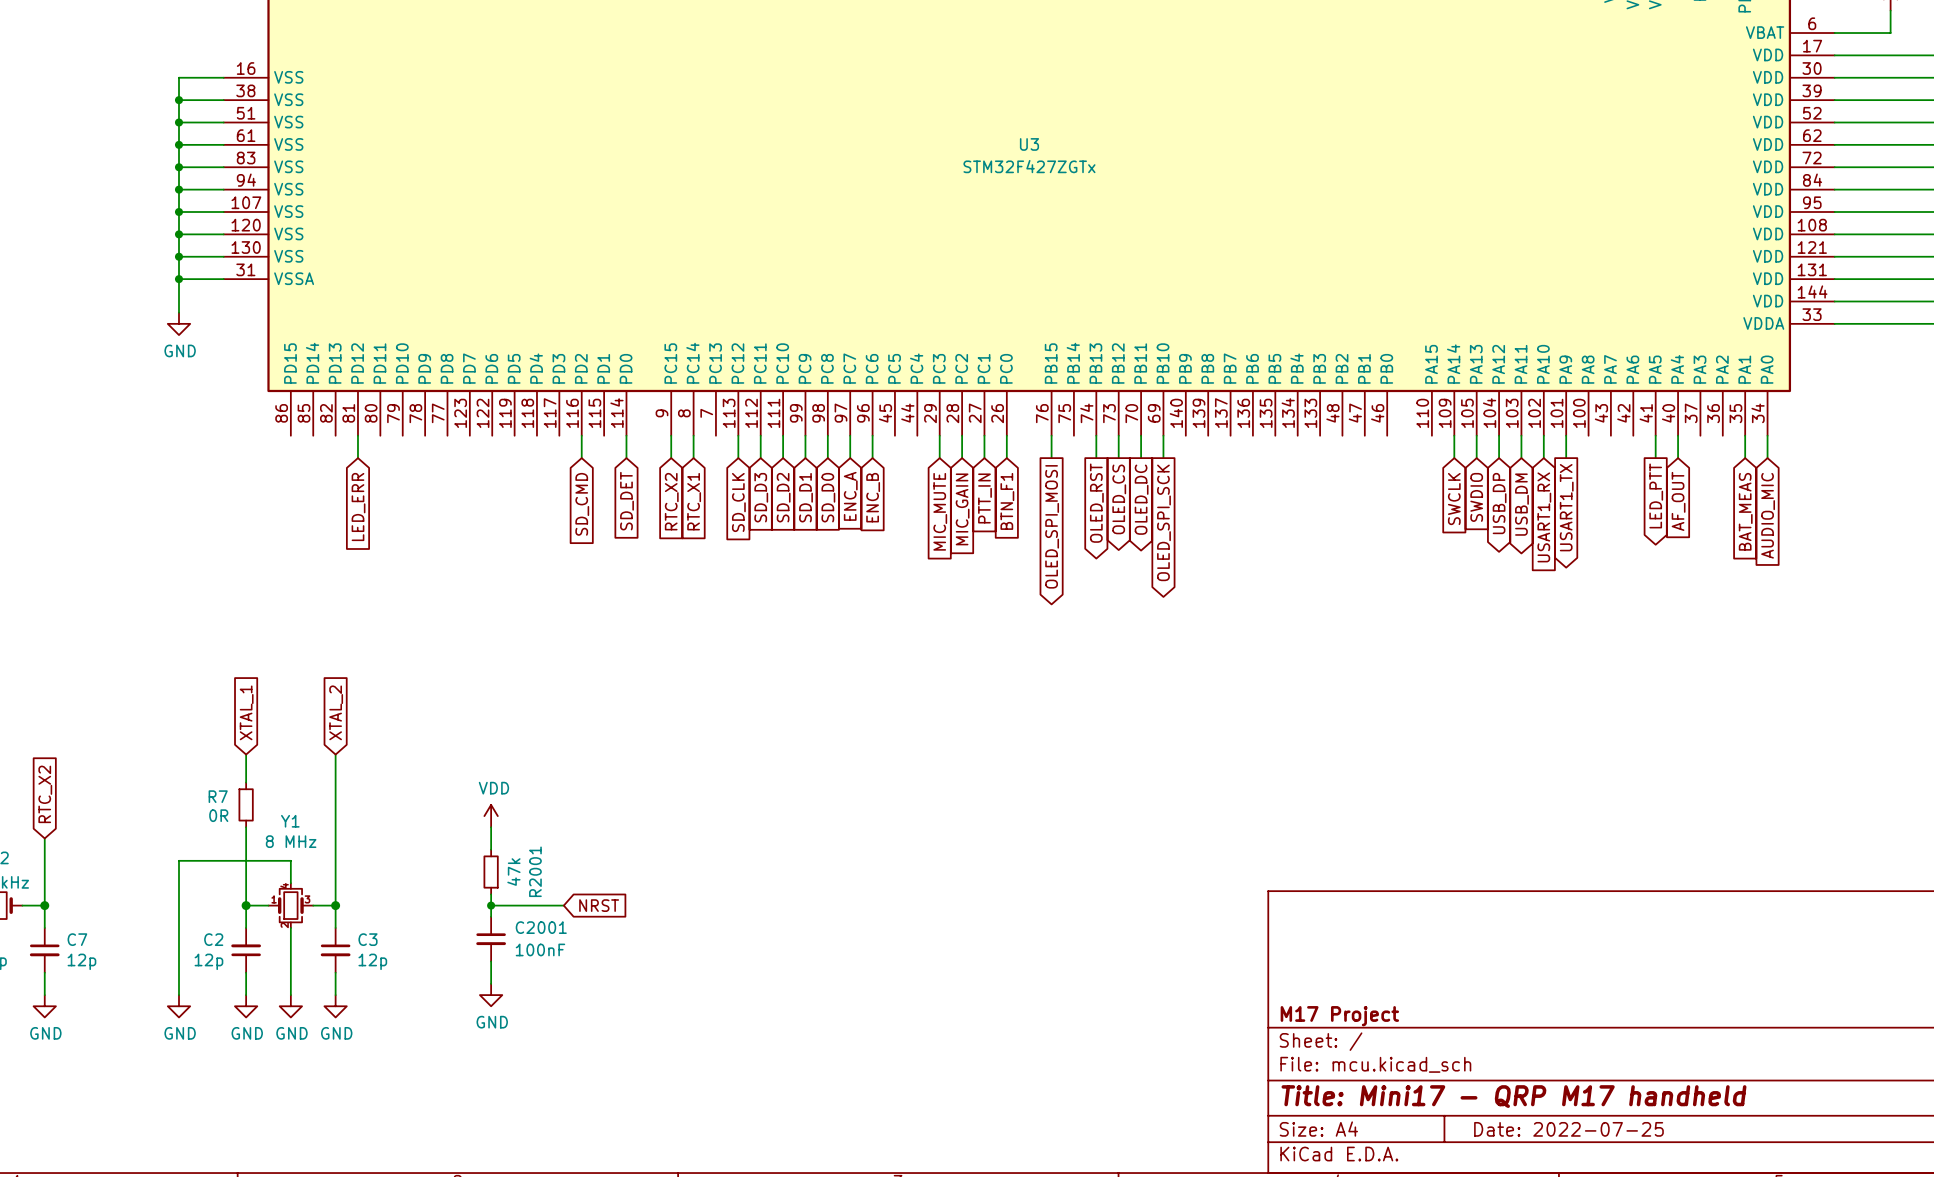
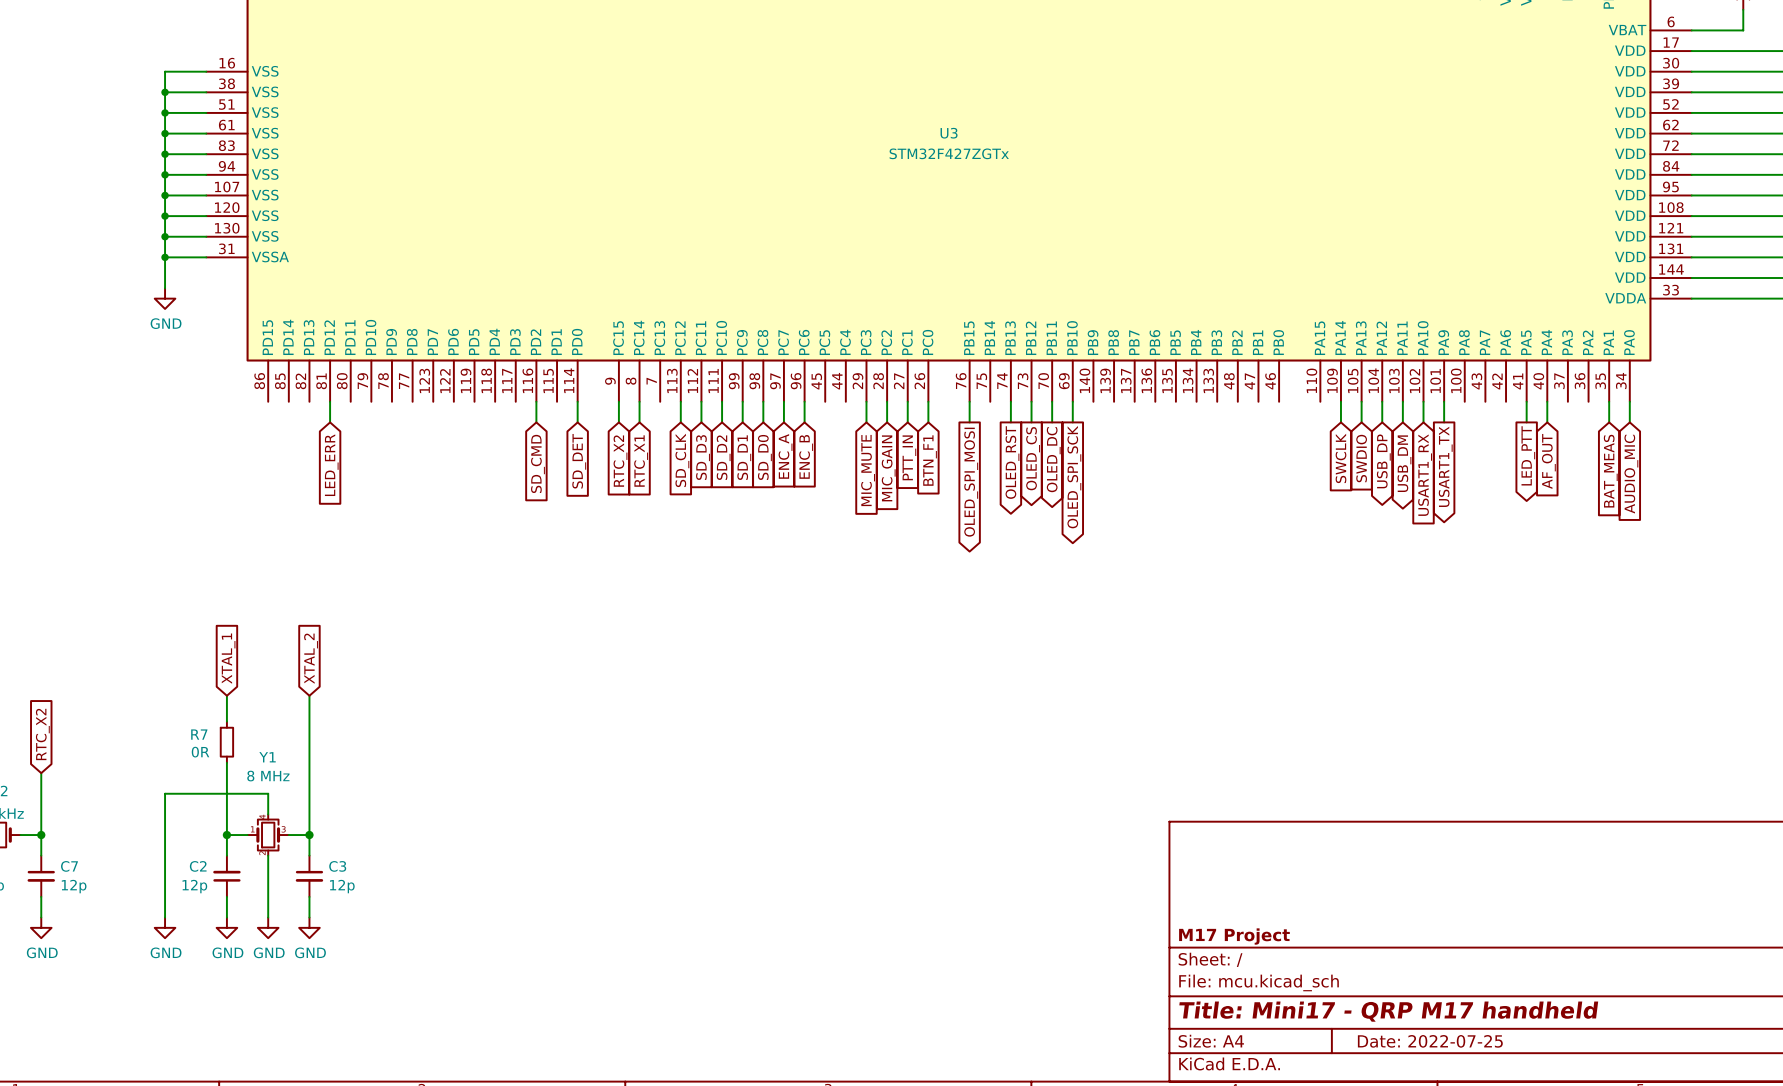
power symbol: VDD (491, 816) -> none
wire: (491, 827) (491, 849) -> none
R2001: 47k (491, 872) -> none
wire: (491, 894) (491, 916) -> none
wire: (491, 905) (563, 905) -> none
junction: (491, 905) -> none
global label: NRST (599, 905) -> none
C2001: 100nF (491, 939) -> none
wire: (491, 961) (491, 983) -> none
power symbol: GND (491, 995) -> none

